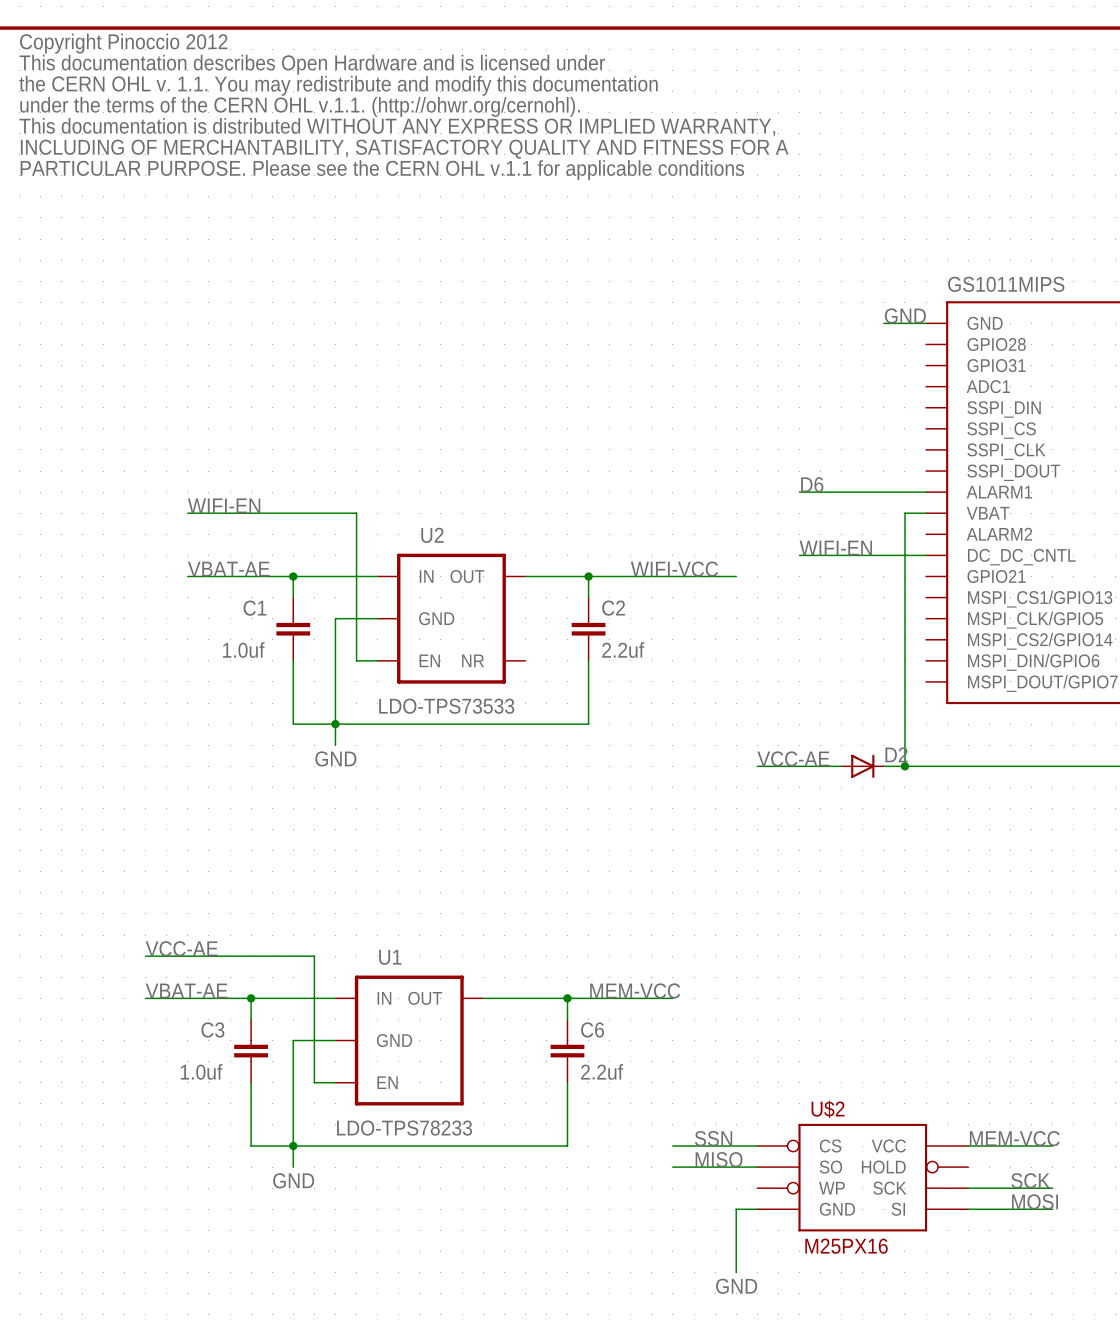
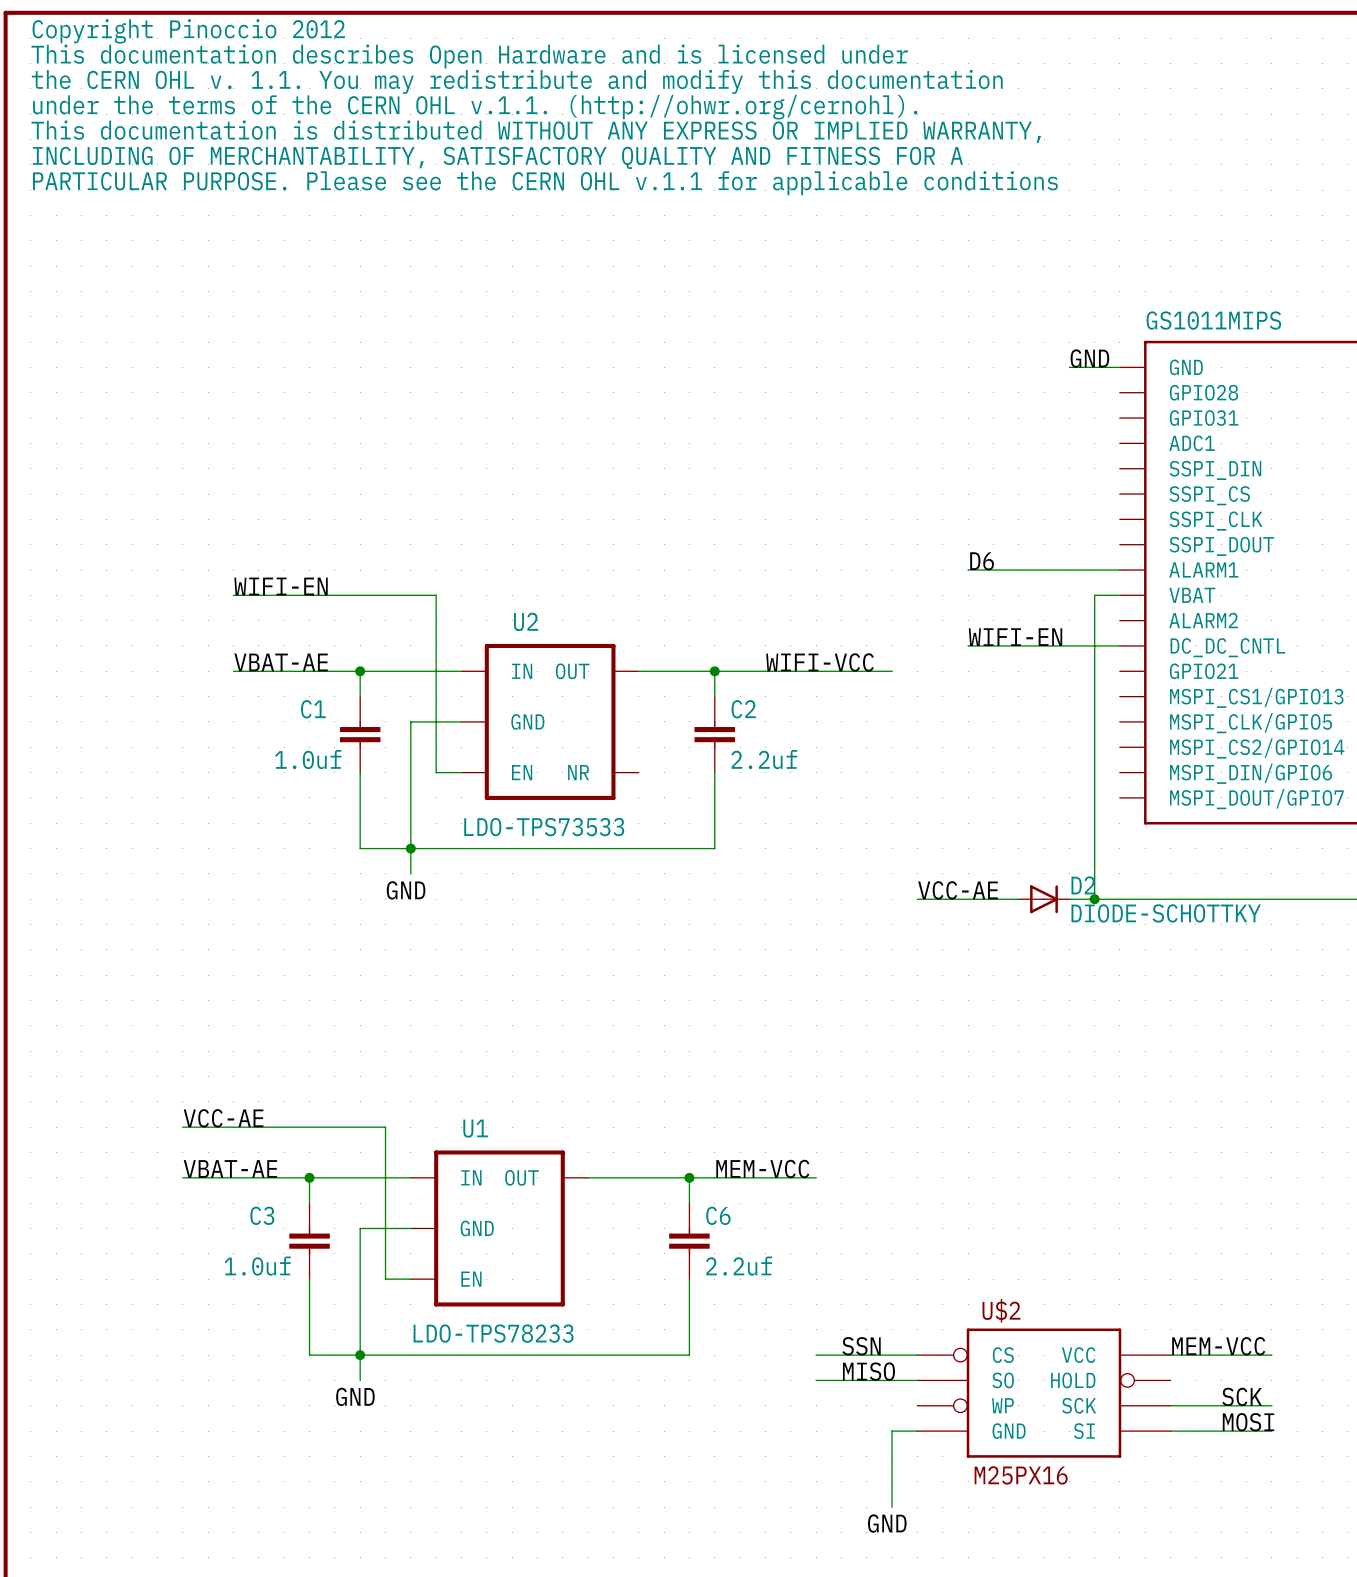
D2 value: none -> DIODE-SCHOTTKY (1166, 913)

